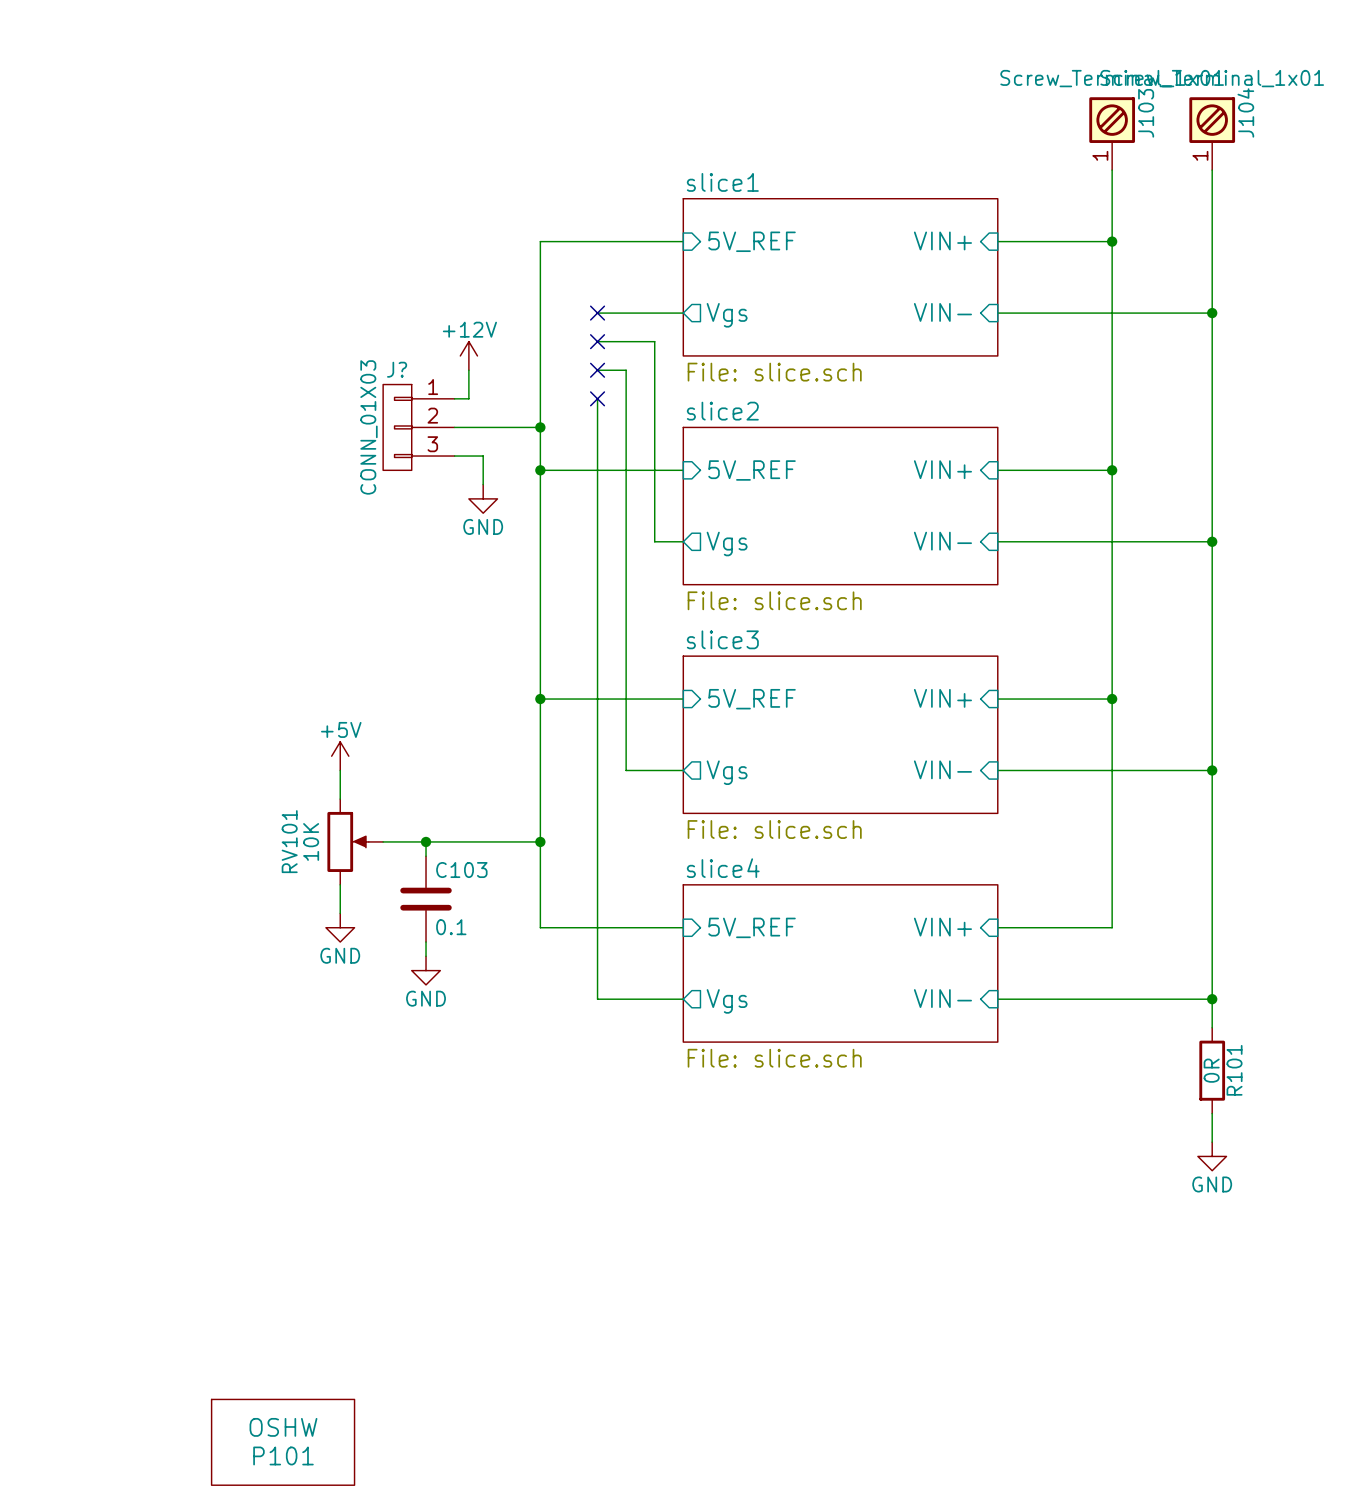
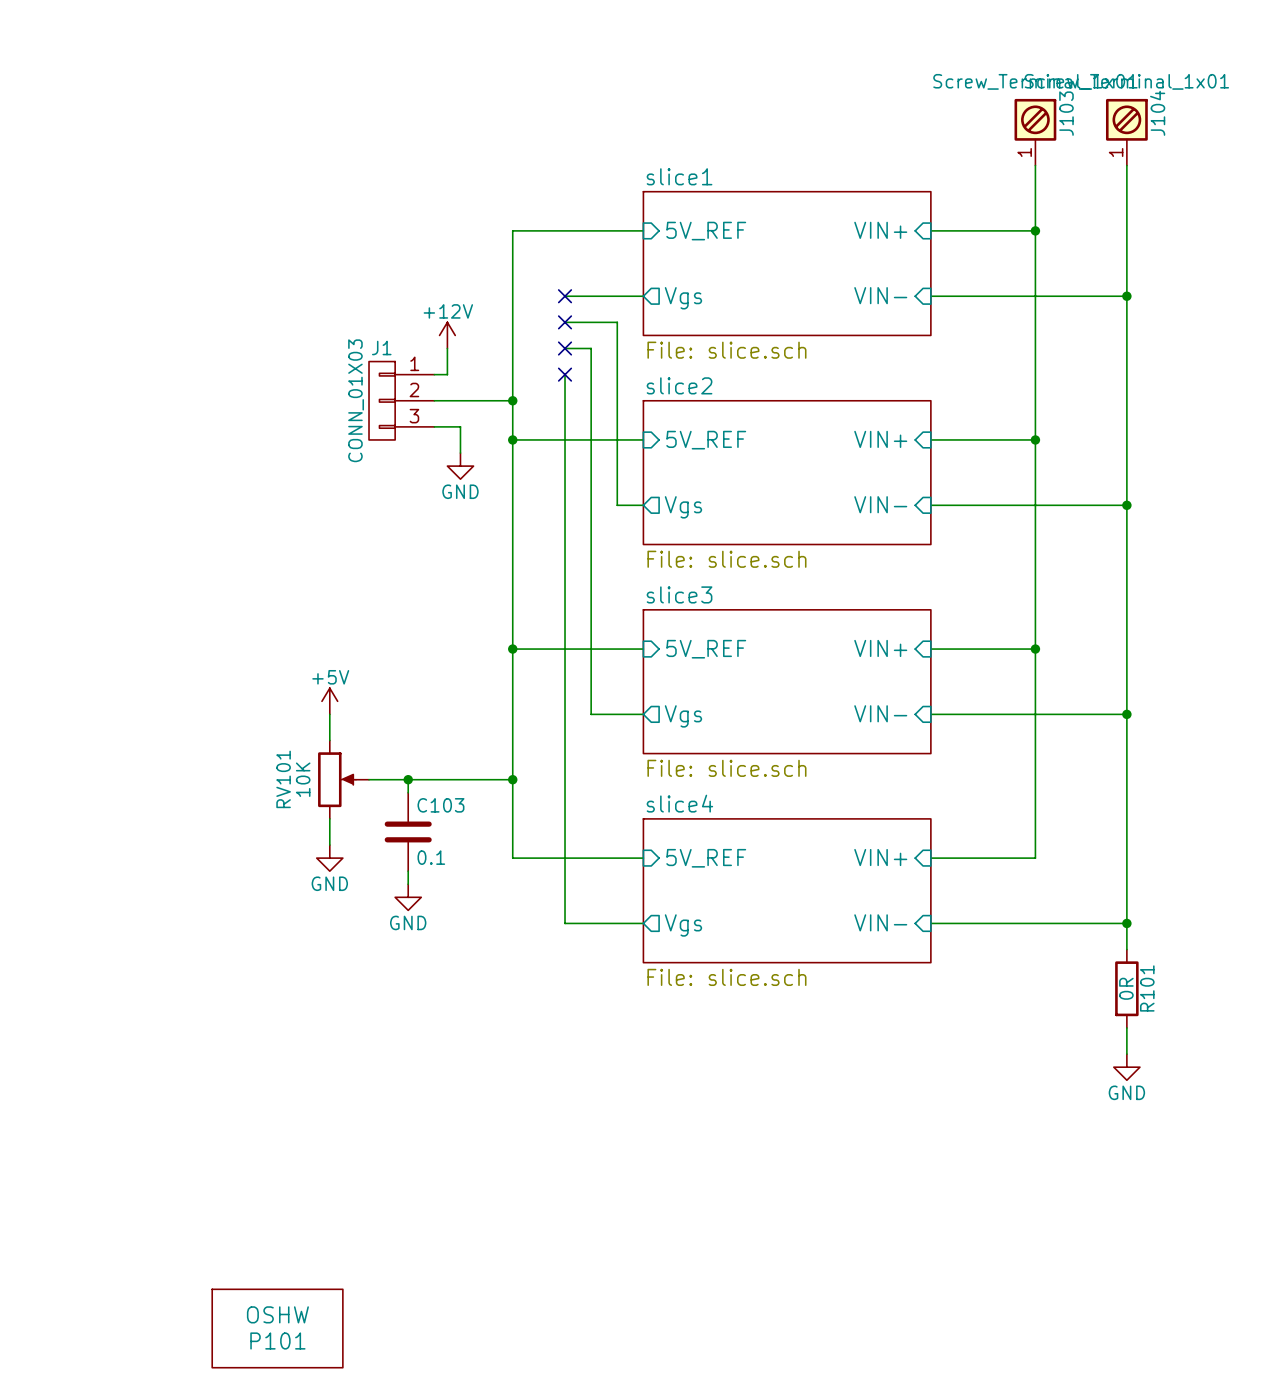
J? name: J? (397, 369) -> J1 (381, 348)

